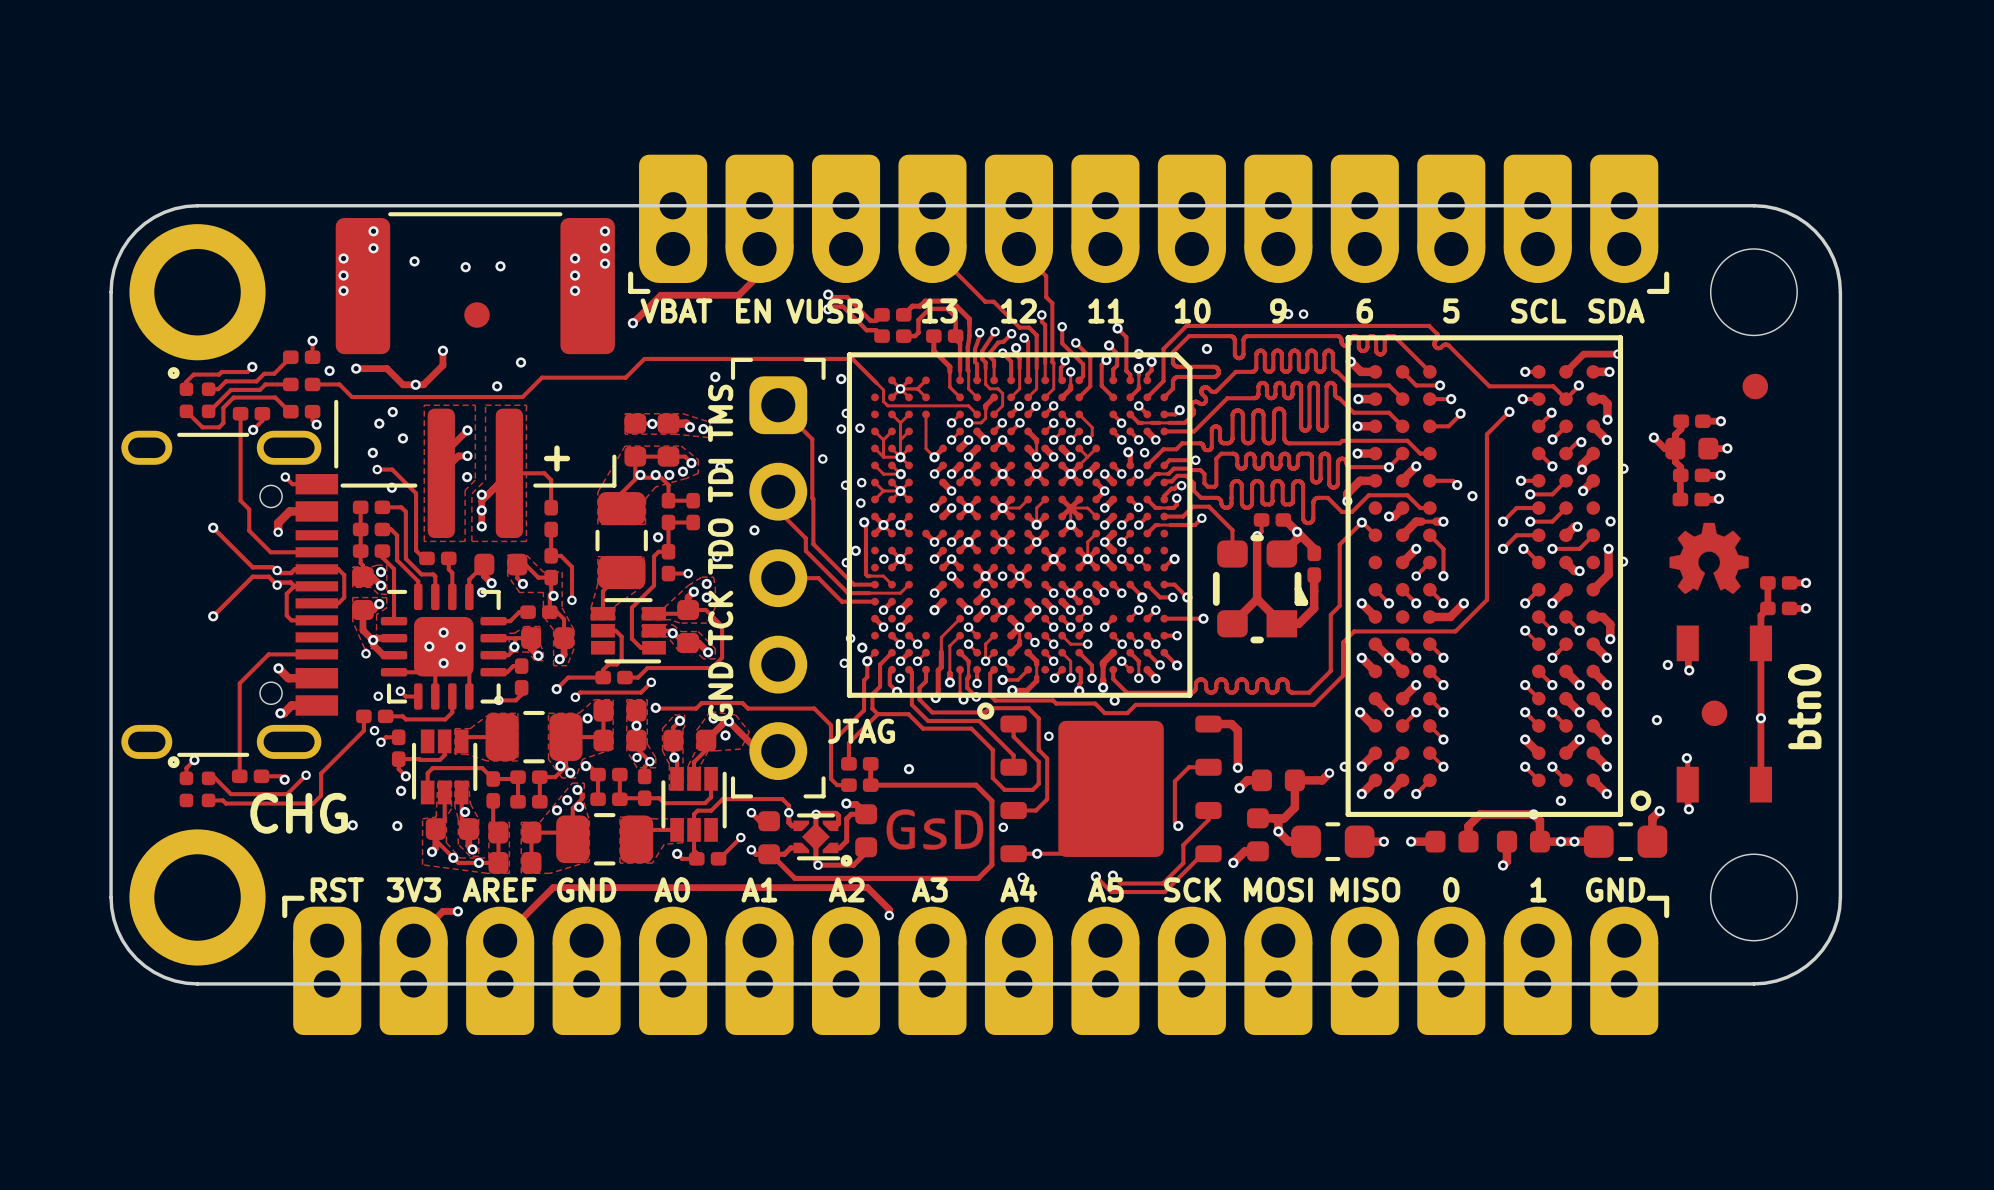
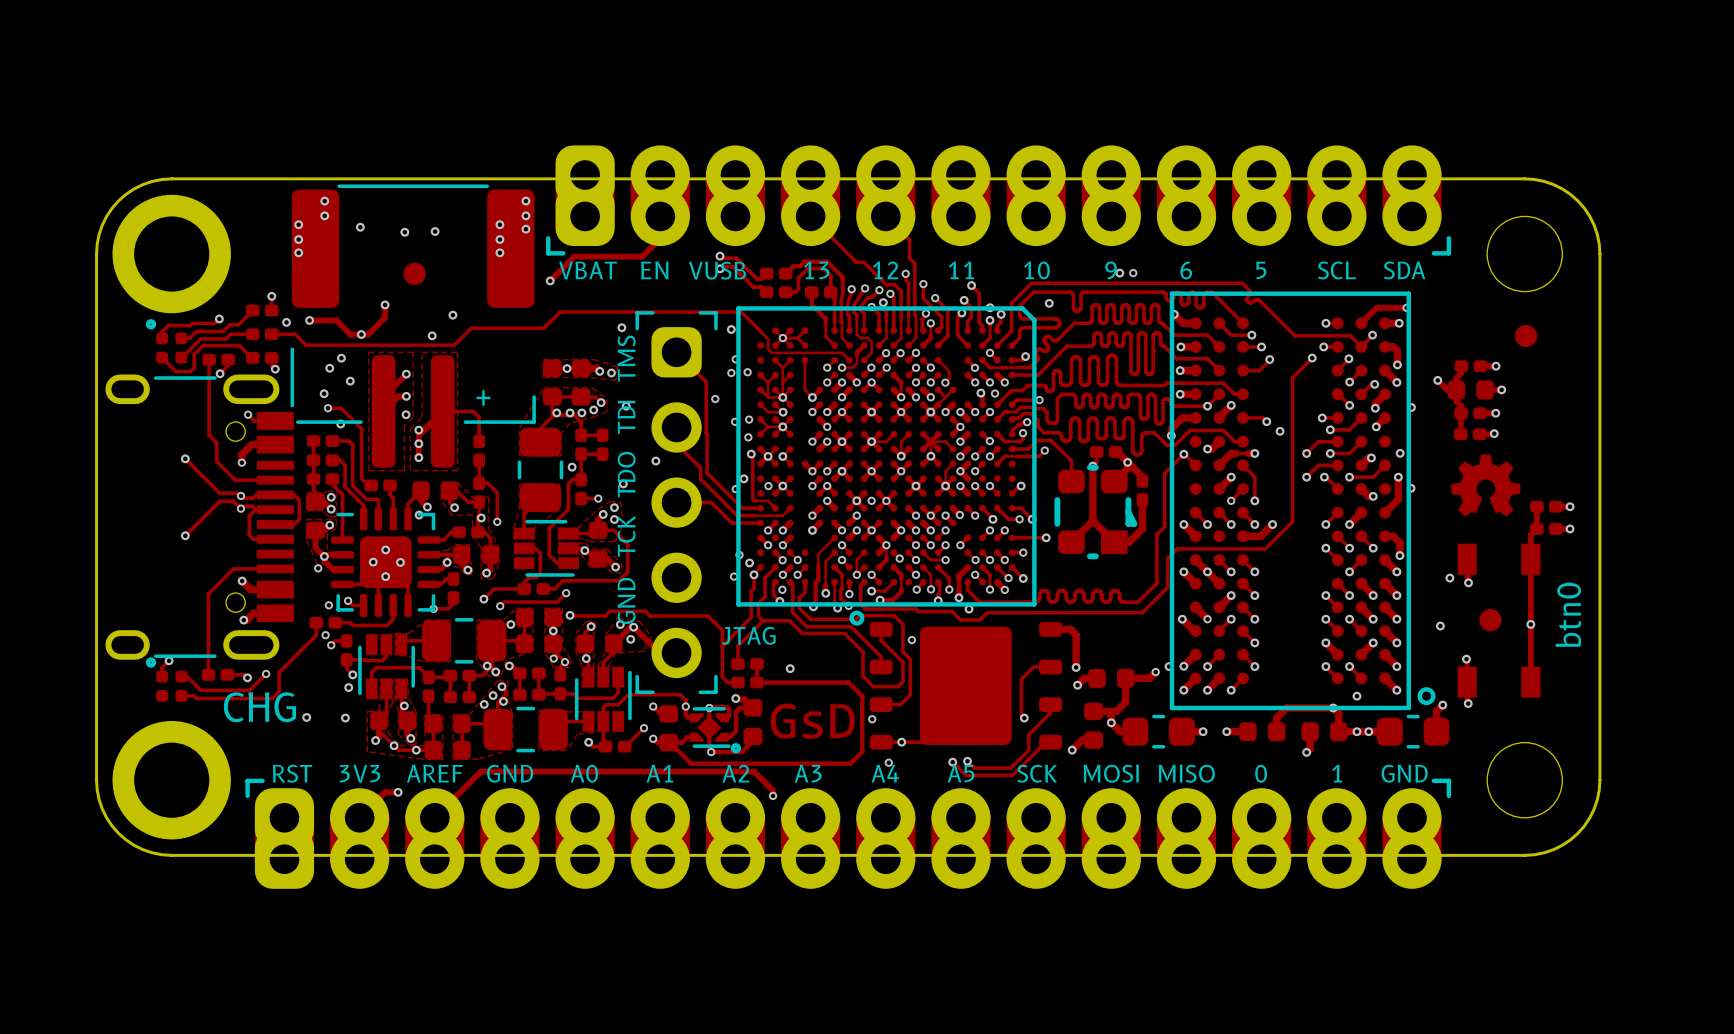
part footprint: [628, 154, 1670, 294] -> [546, 145, 1452, 256]
part footprint: [282, 895, 1670, 1036] -> [245, 778, 1452, 889]

